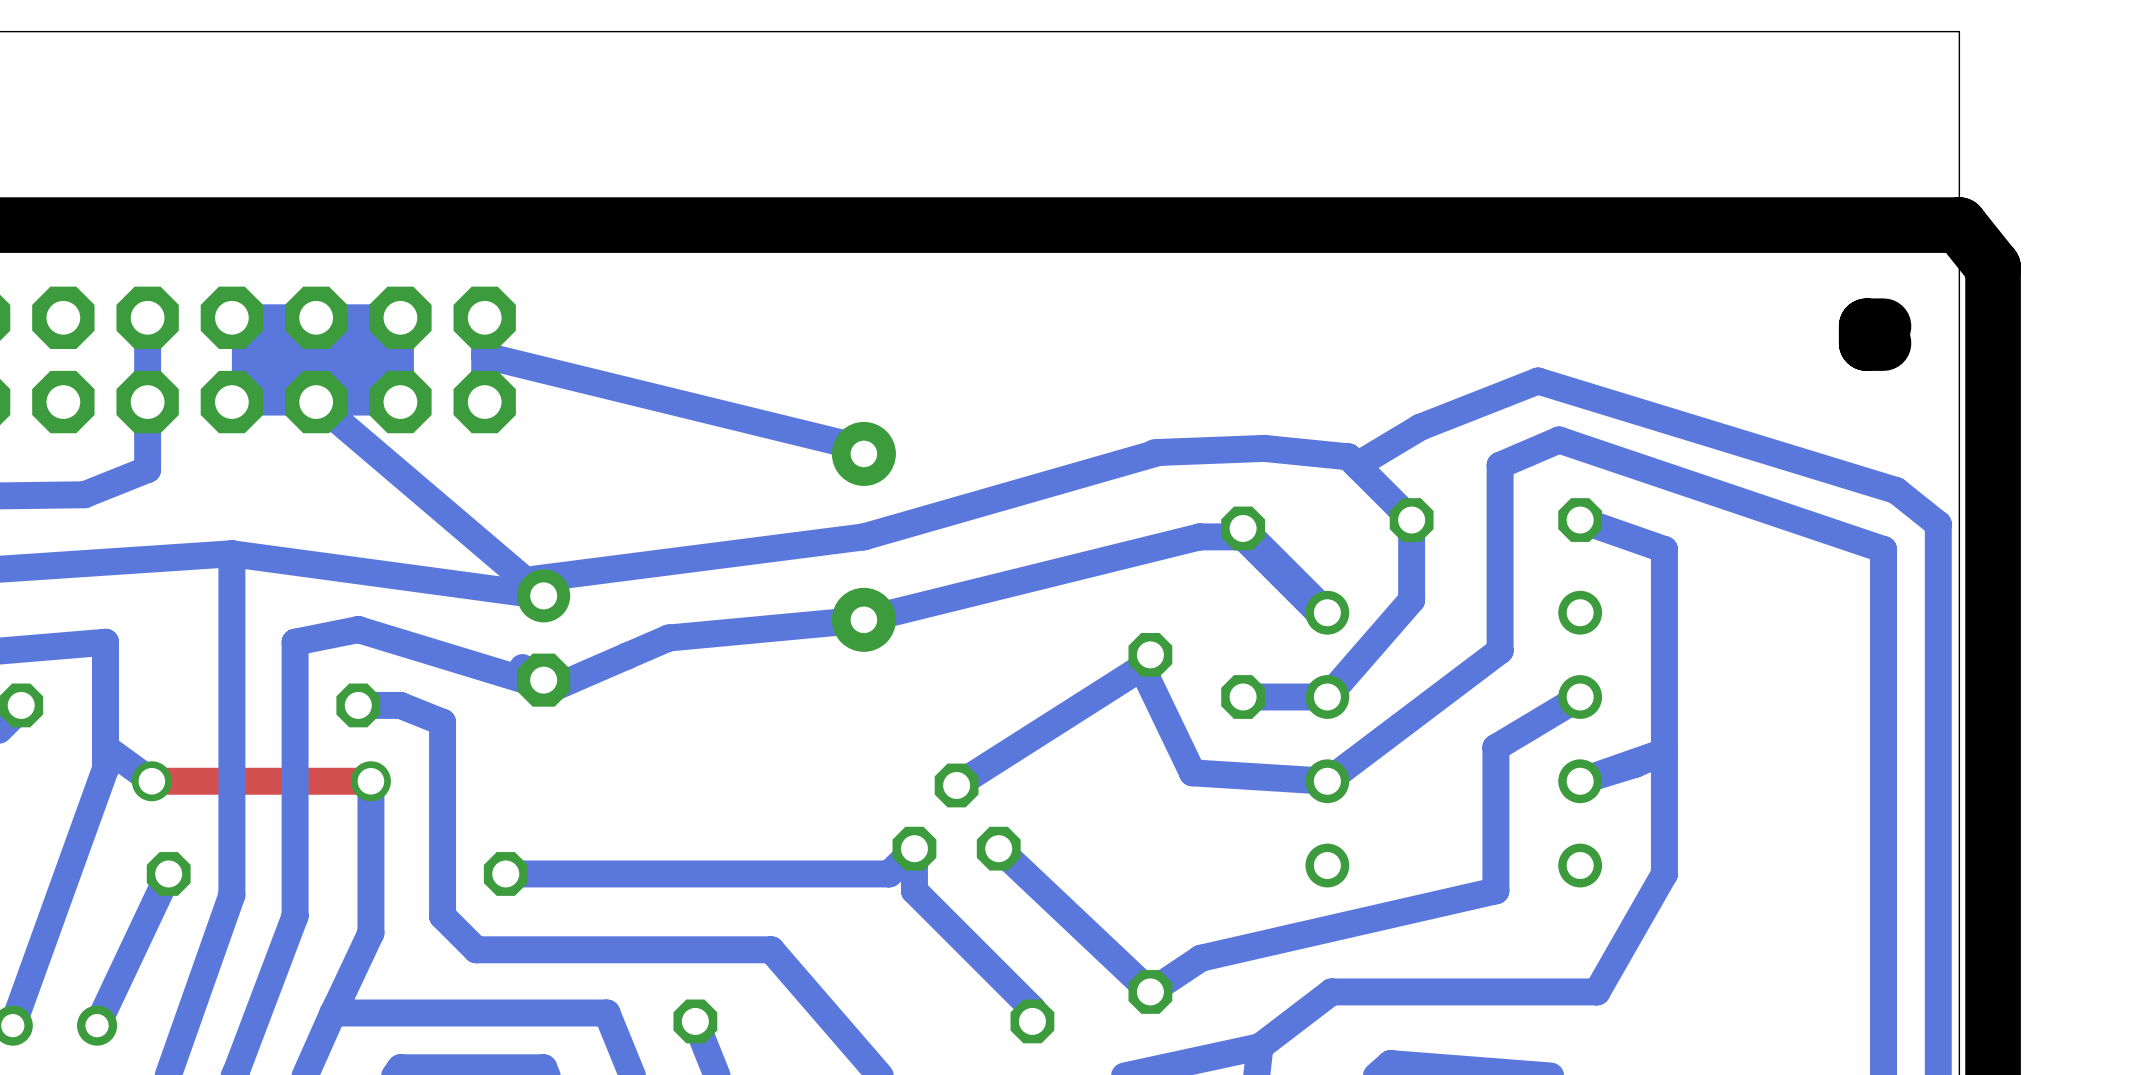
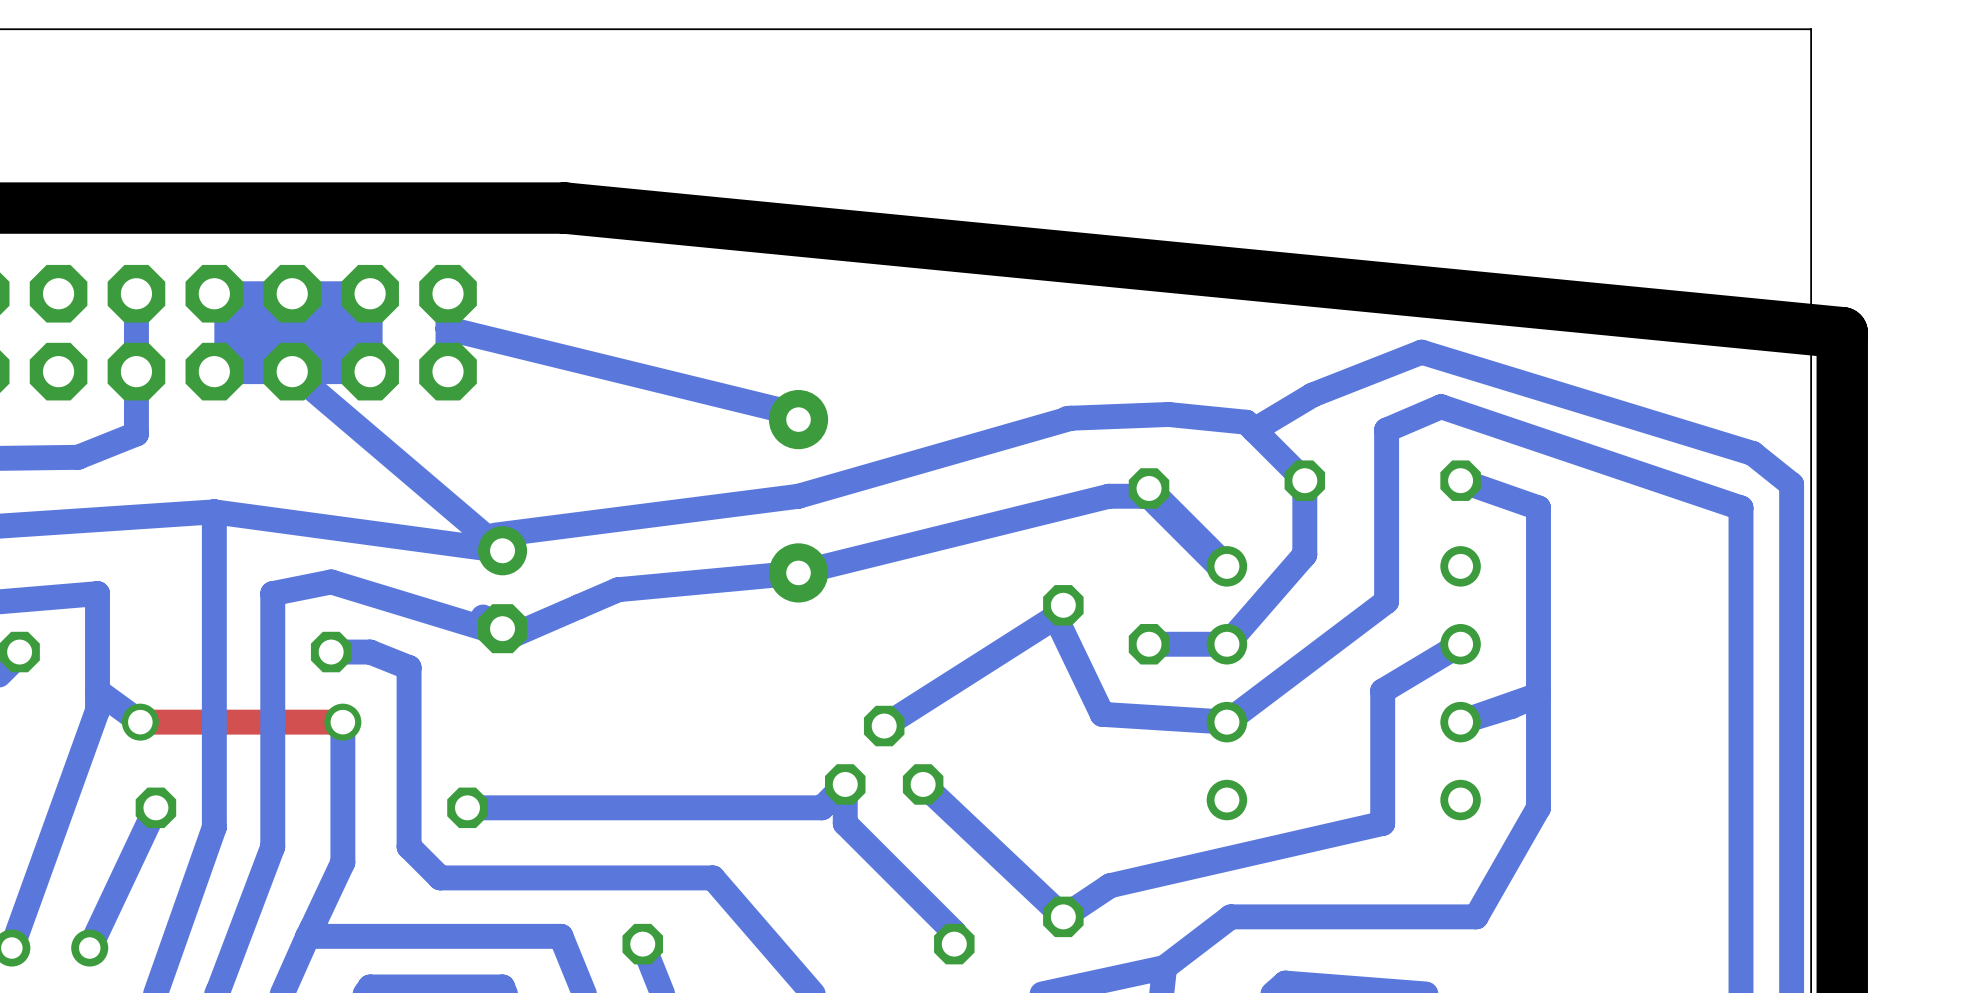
board edge: (611, 225) (1959, 225) (1993, 267) (1993, 359) -> (564, 208) (1842, 332)
board edge: (1883, 326) (1866, 326) (1866, 343) (1883, 343) -> none

